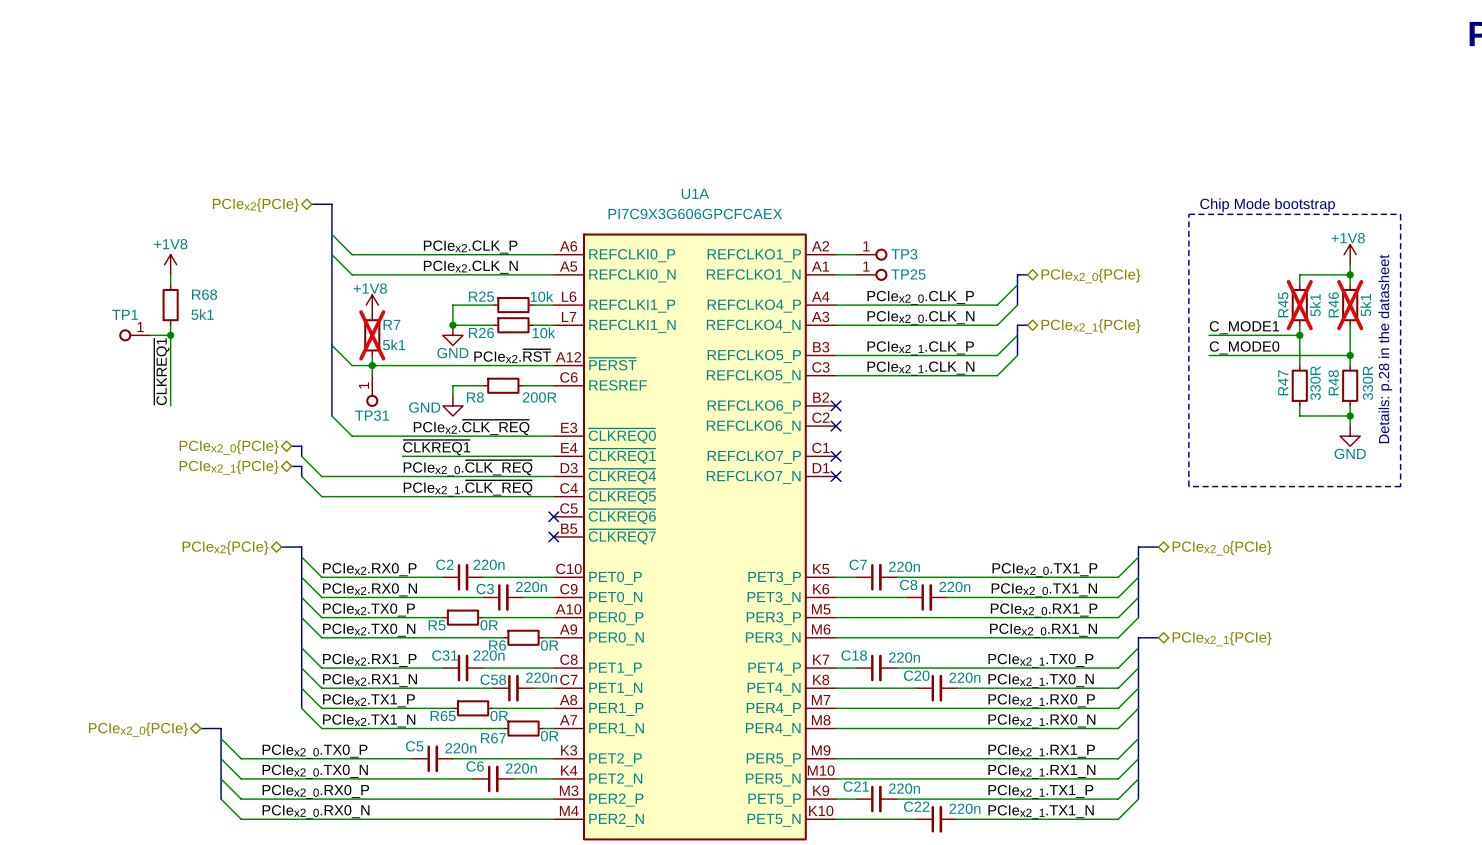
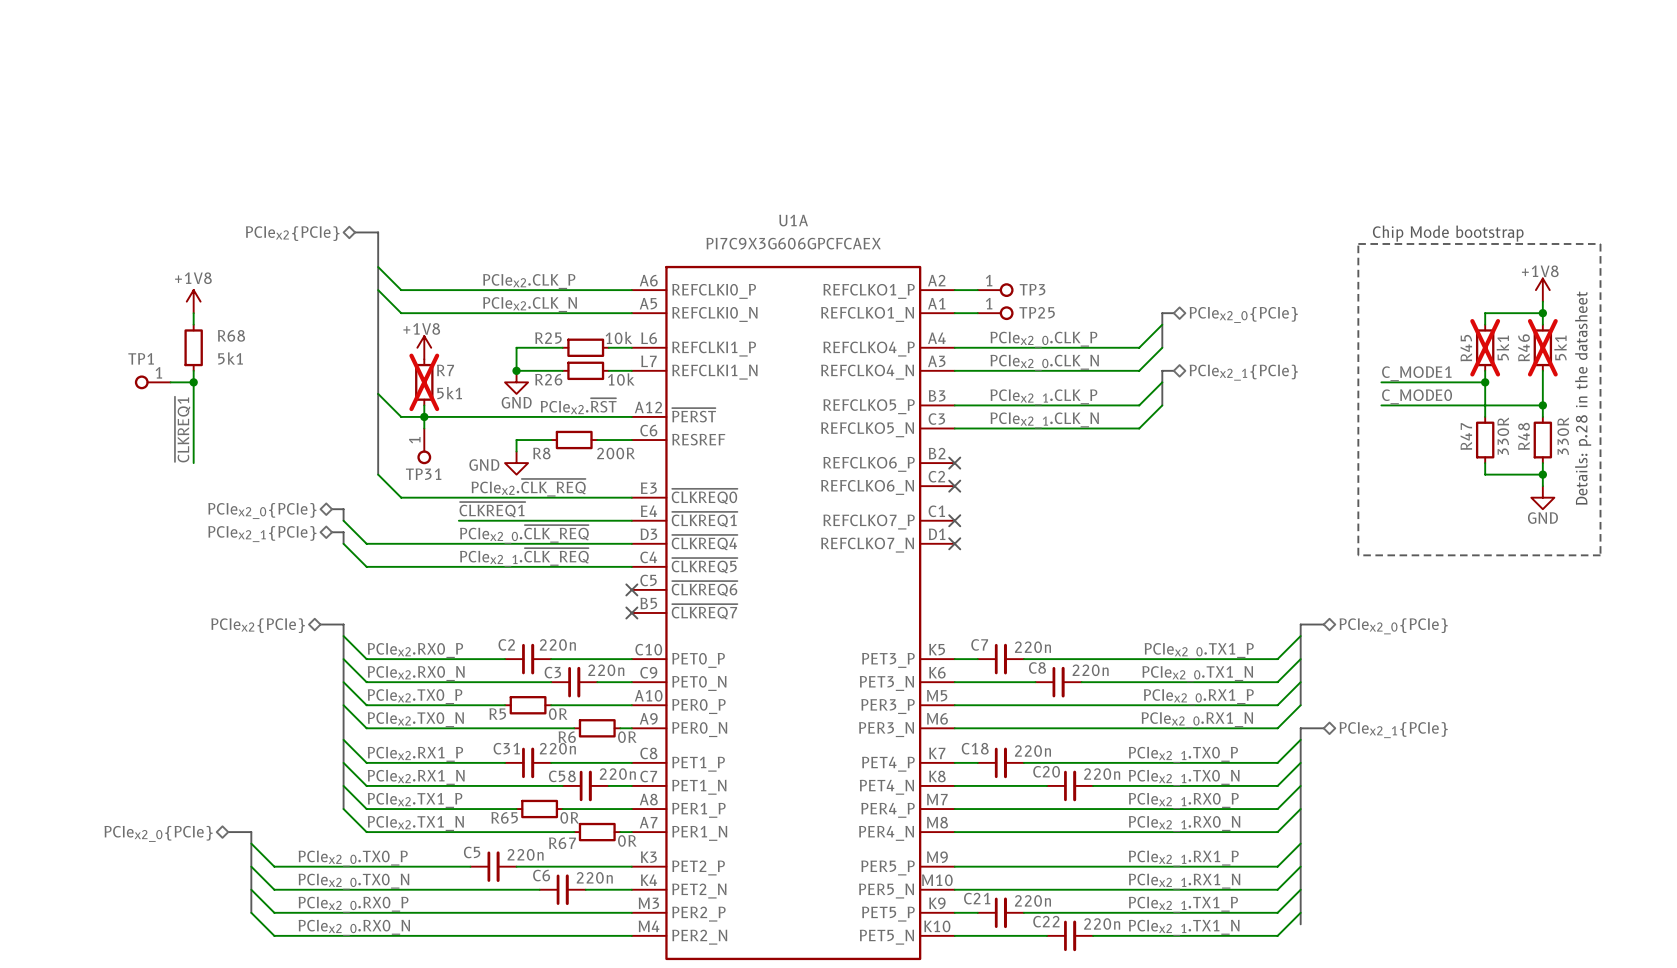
bus: none -> (1300, 912) (1300, 924)

